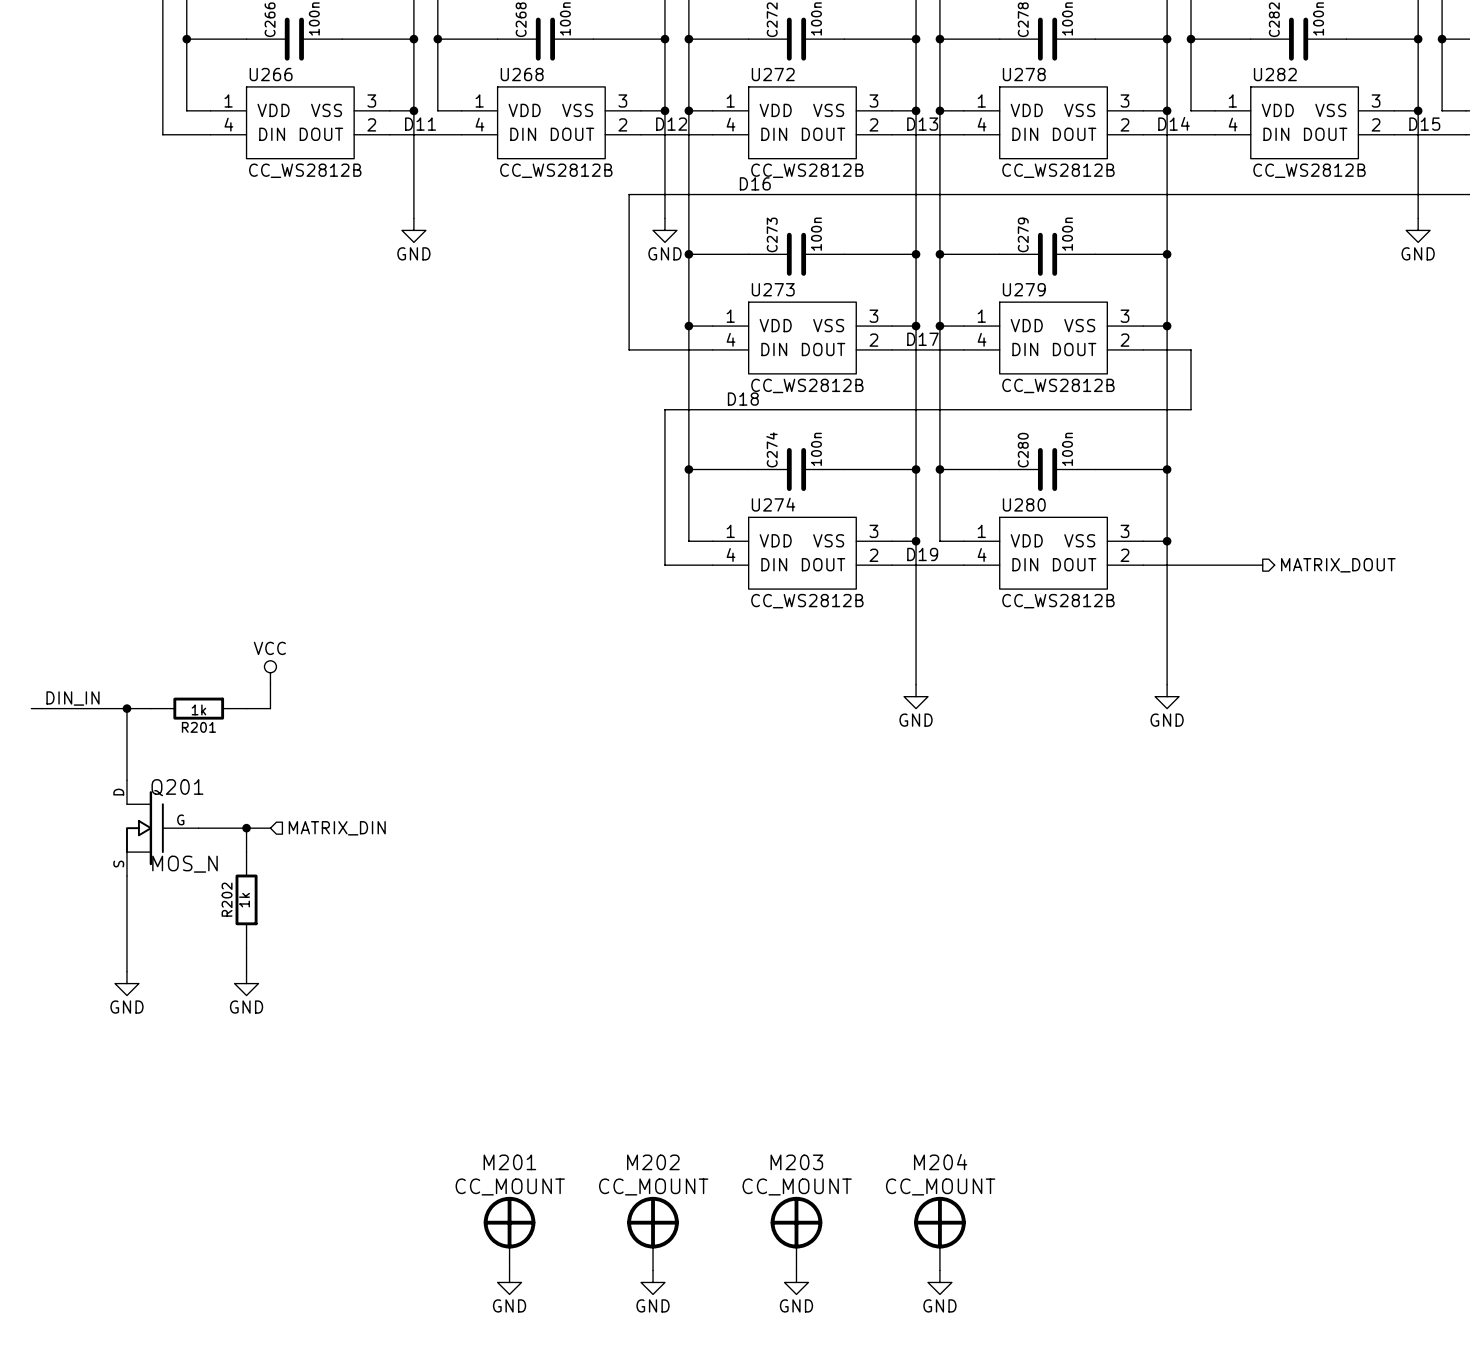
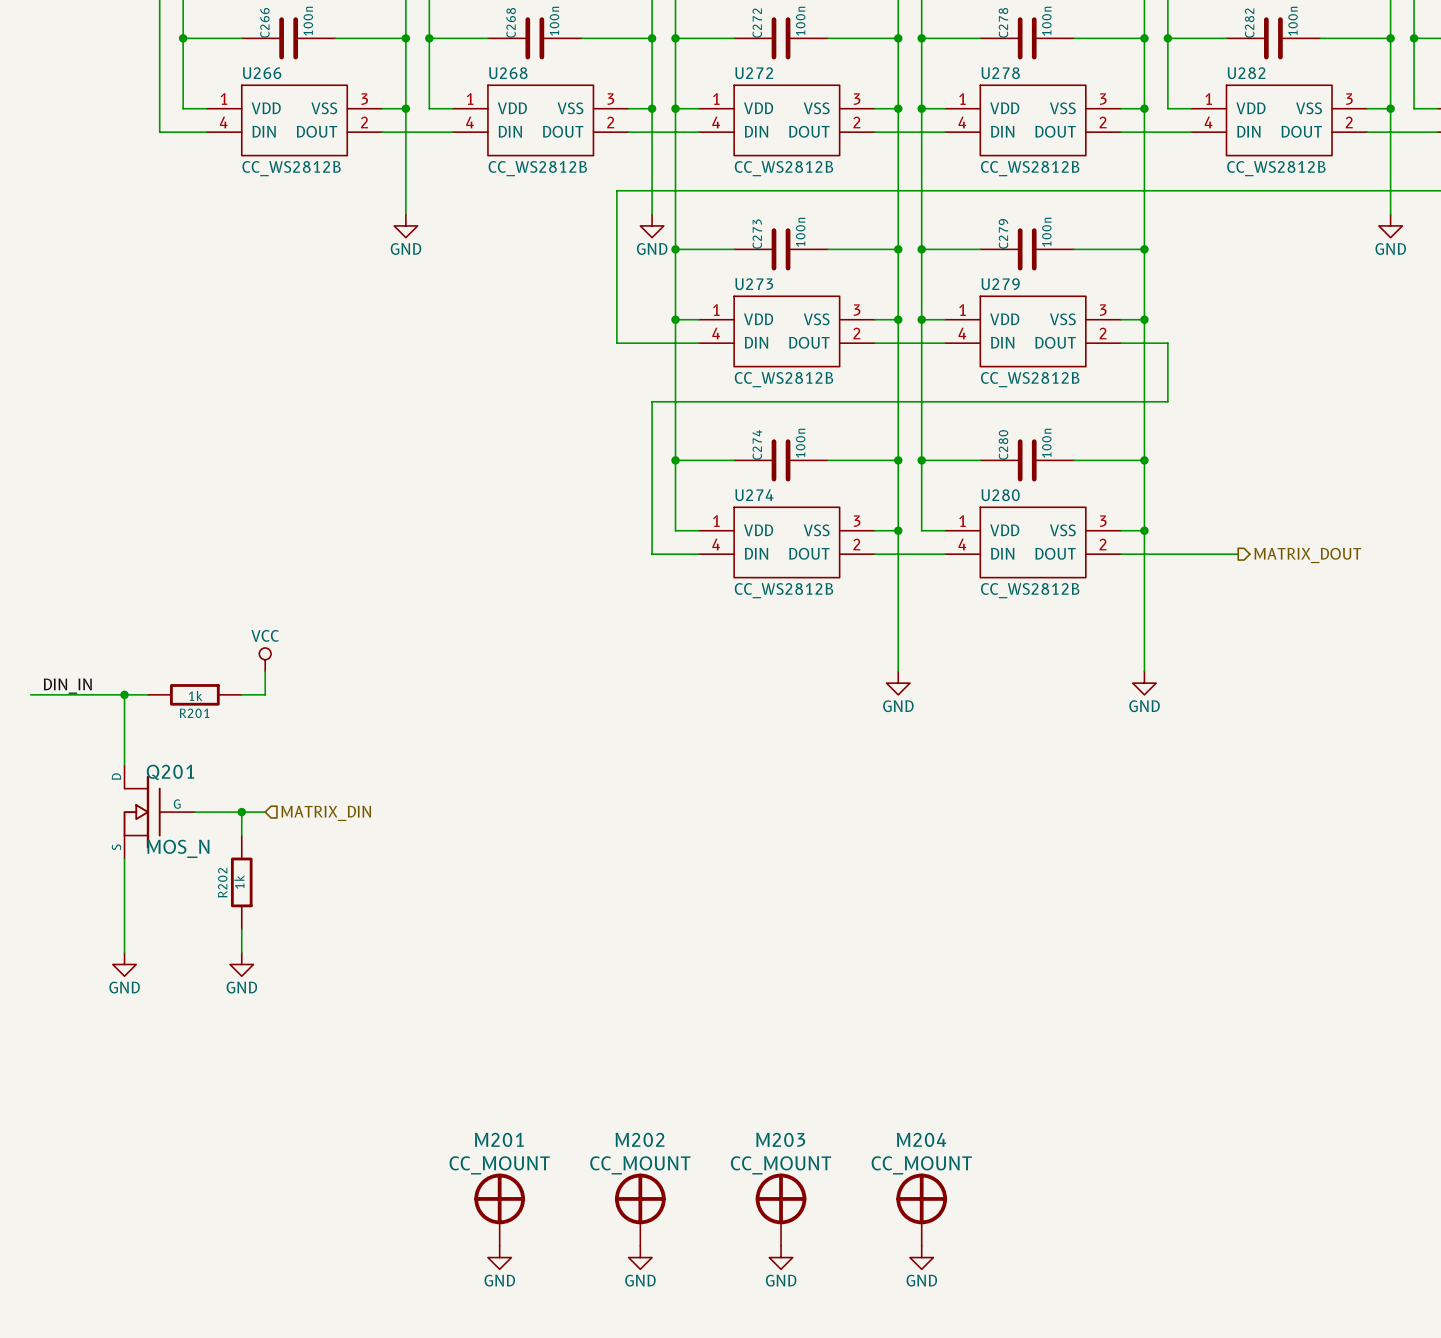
label: D14 (1174, 123) -> none
label: D11 (420, 124) -> none
label: D12 (671, 124) -> none
label: D13 (922, 124) -> none
label: D15 (1424, 124) -> none
label: D16 (755, 183) -> none
label: D17 (922, 339) -> none
label: D18 (743, 399) -> none
label: D19 (922, 554) -> none

